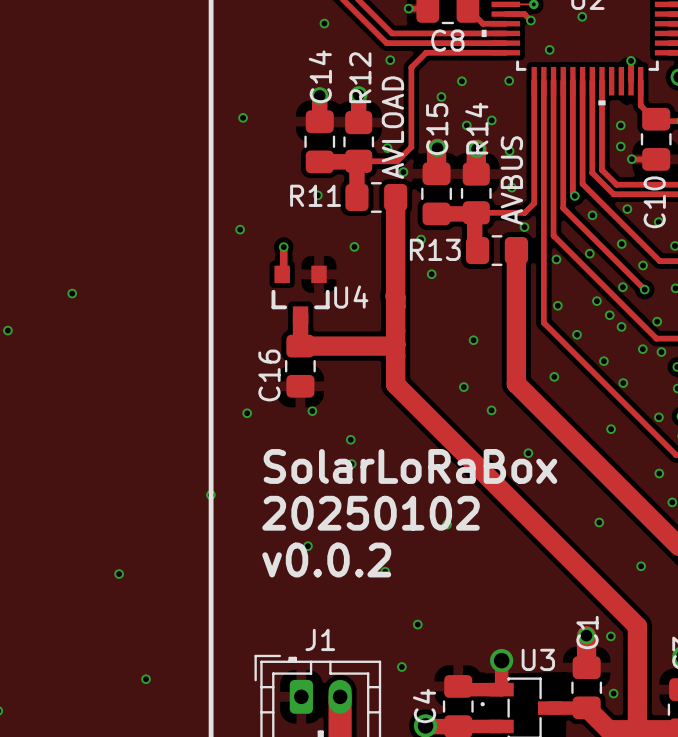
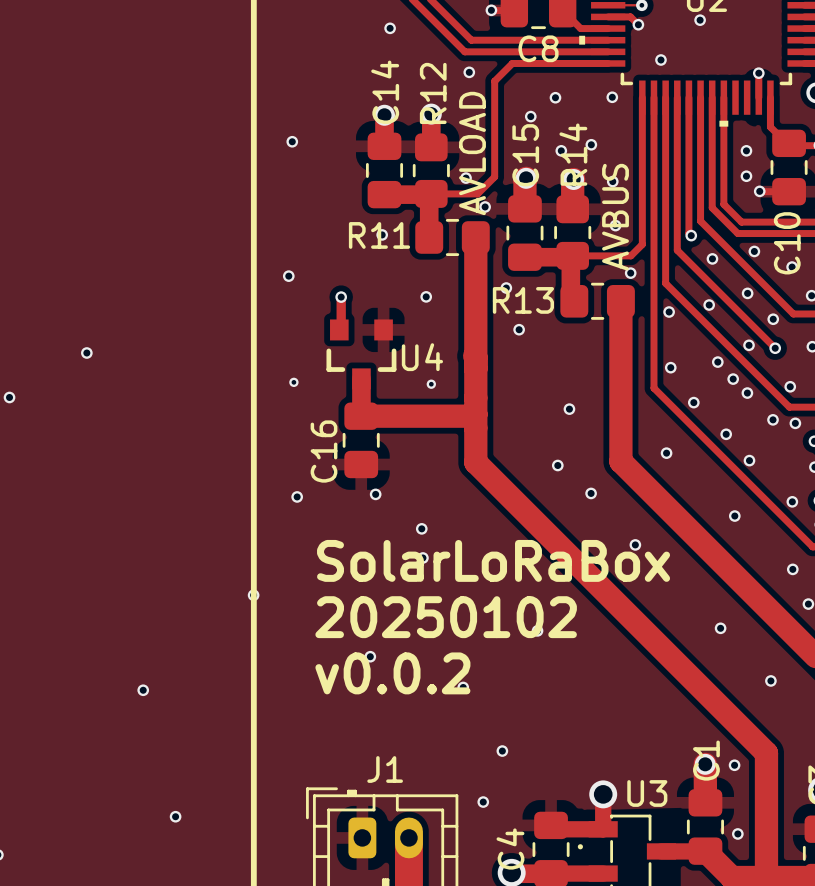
via: none -> (293, 382)
via: none -> (431, 384)

